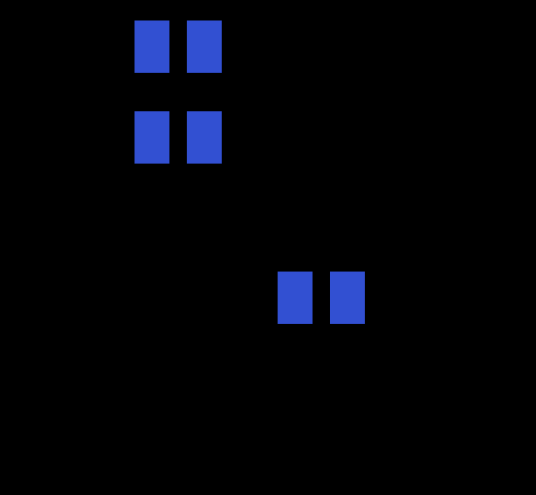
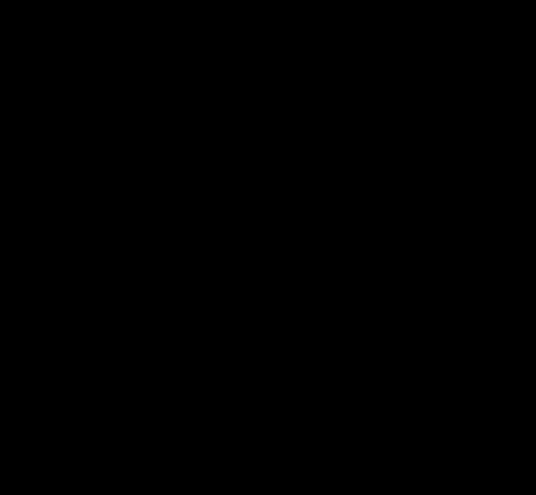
part: (178, 46) -> none
part: (178, 137) -> none
part: (321, 297) -> none

